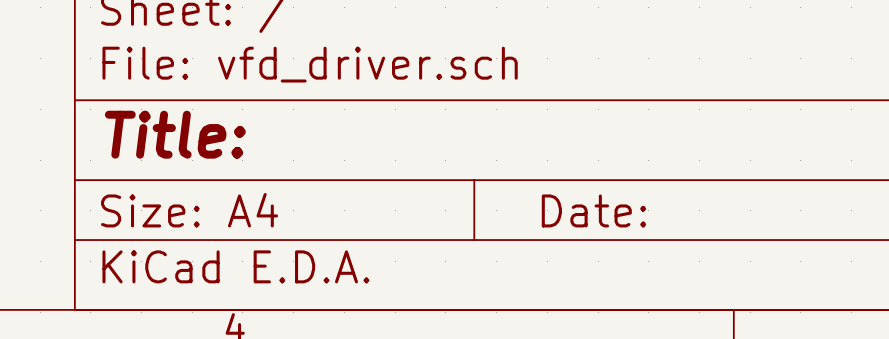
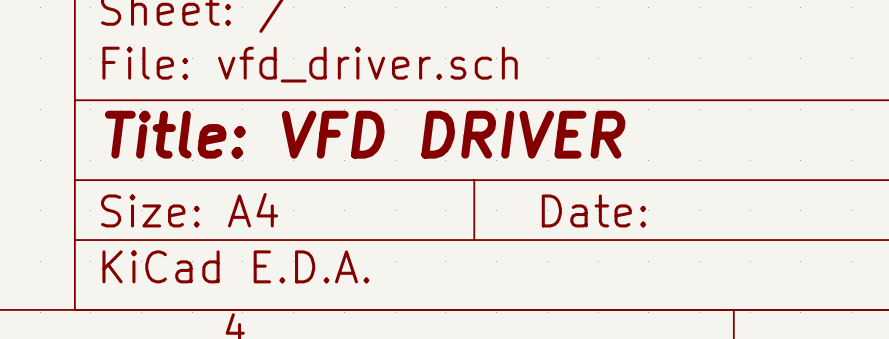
title block: Title: (175, 134) -> Title: VFD DRIVER (365, 134)

